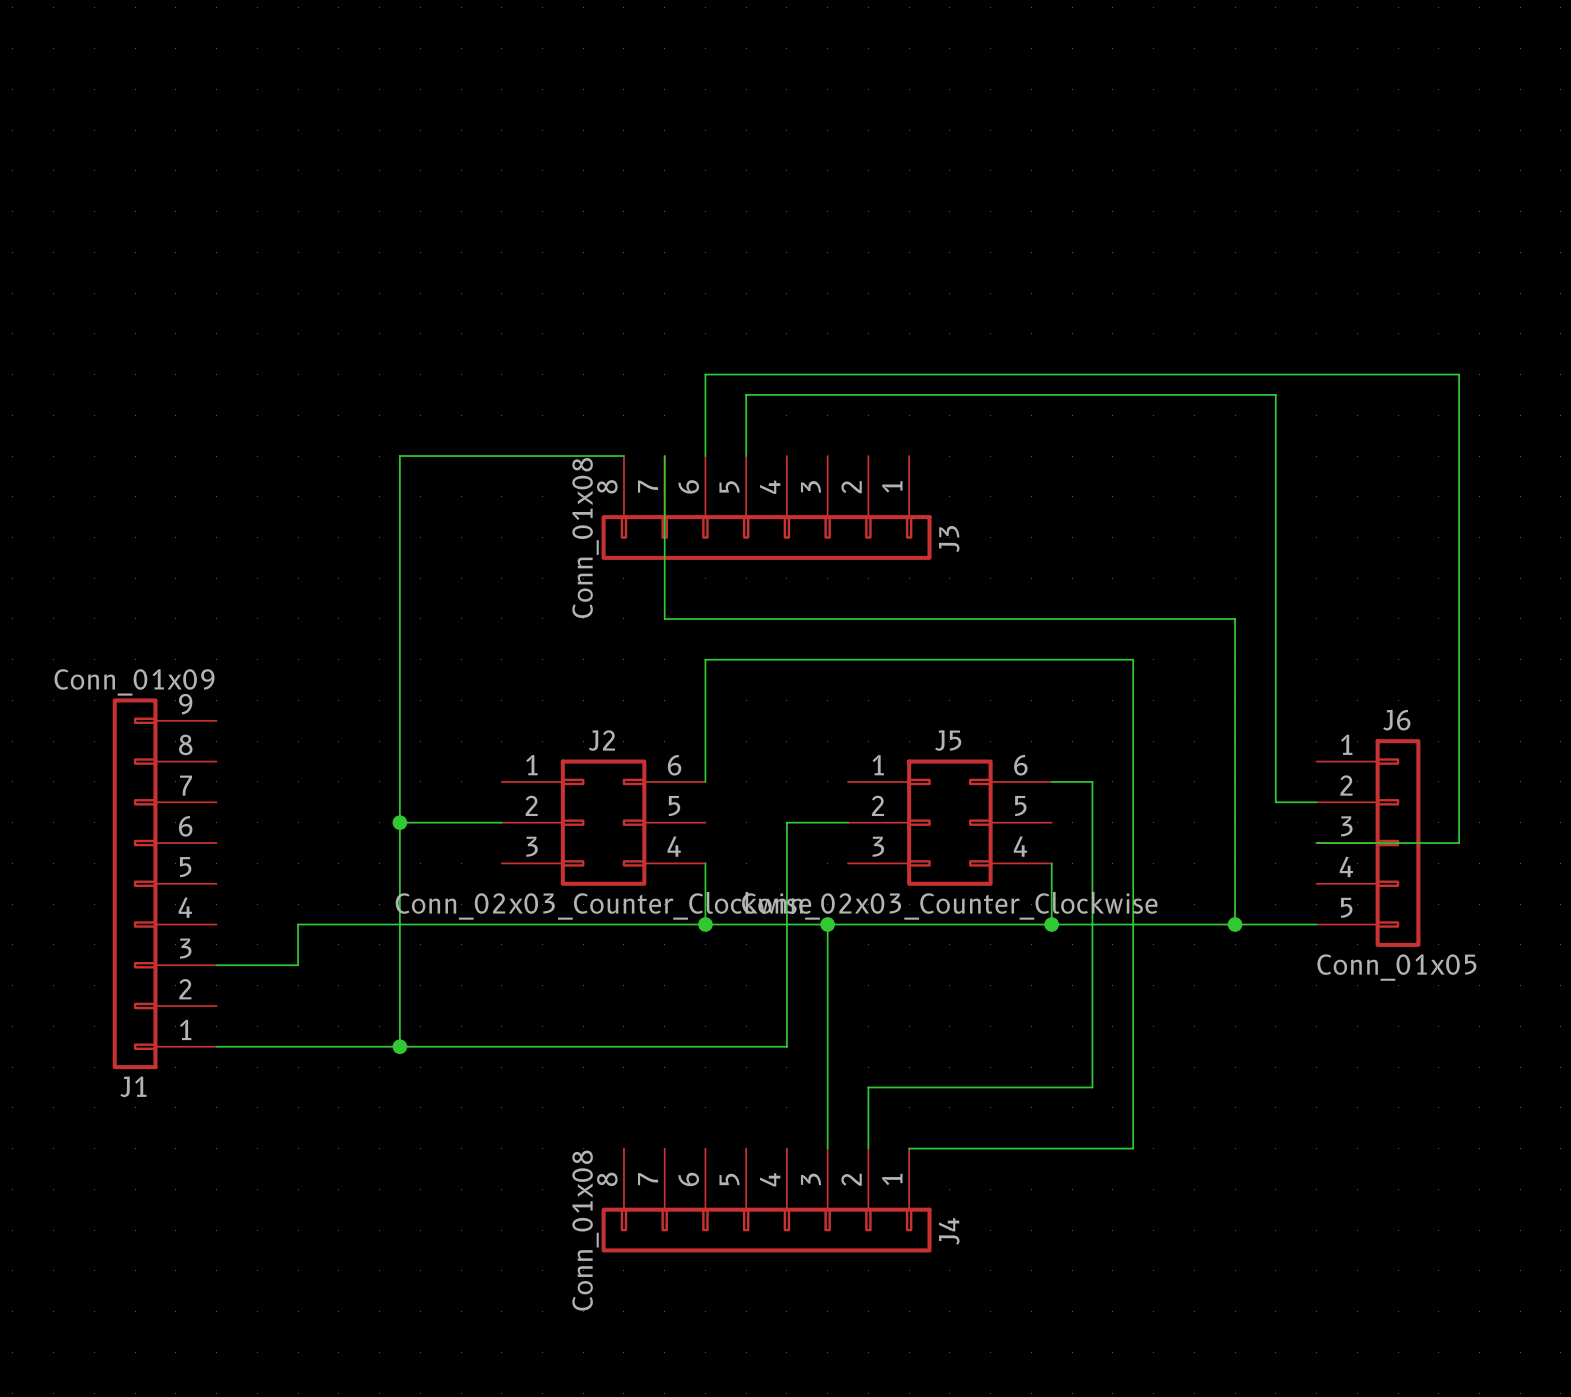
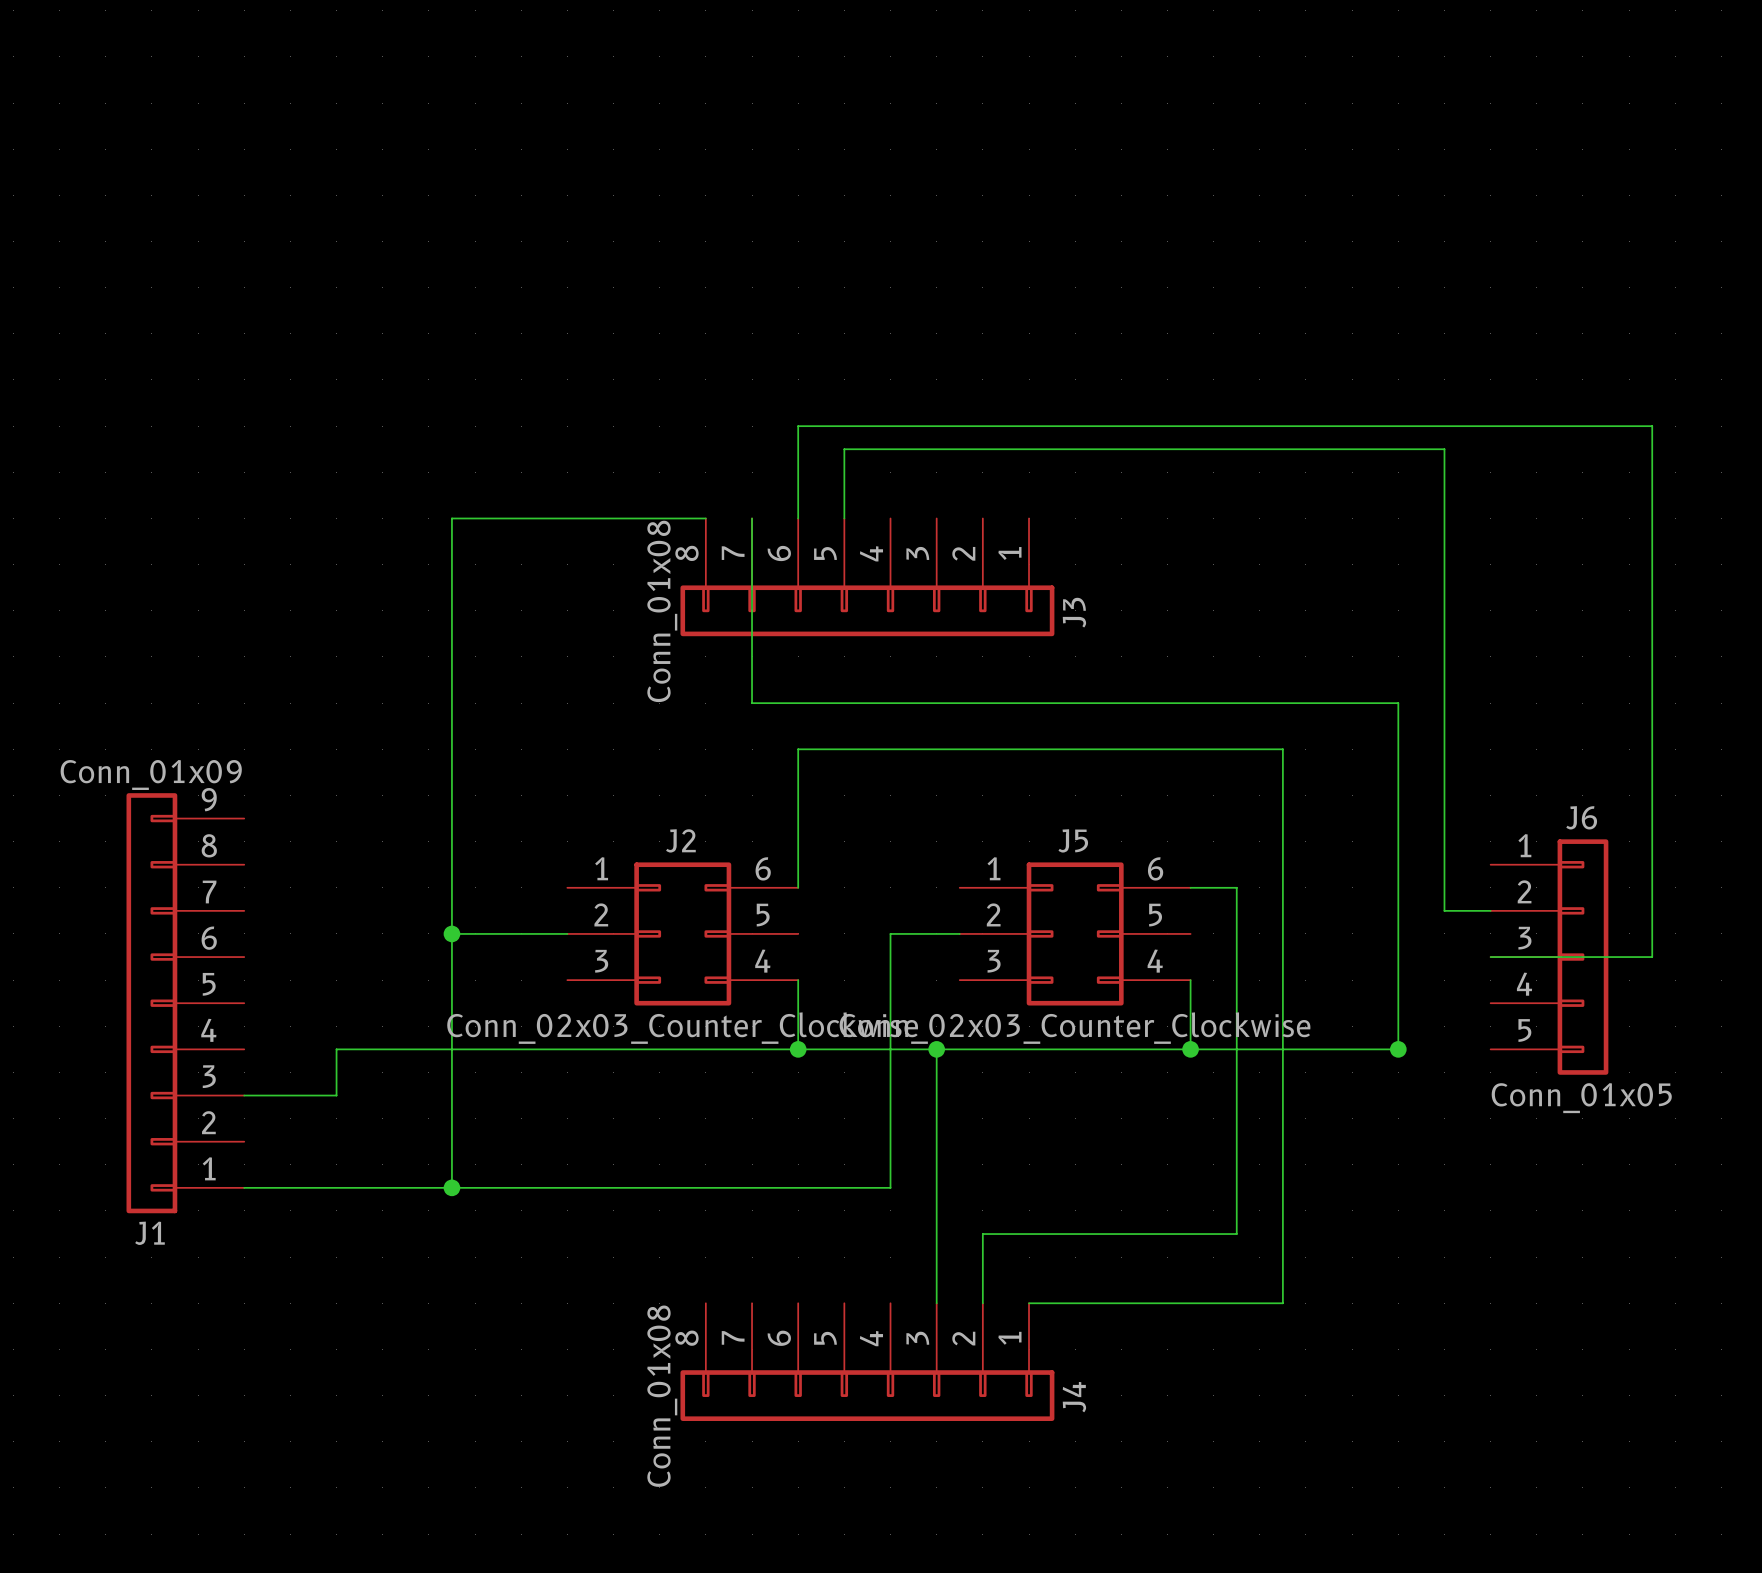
wire: (1235, 924) (1316, 924) -> none

